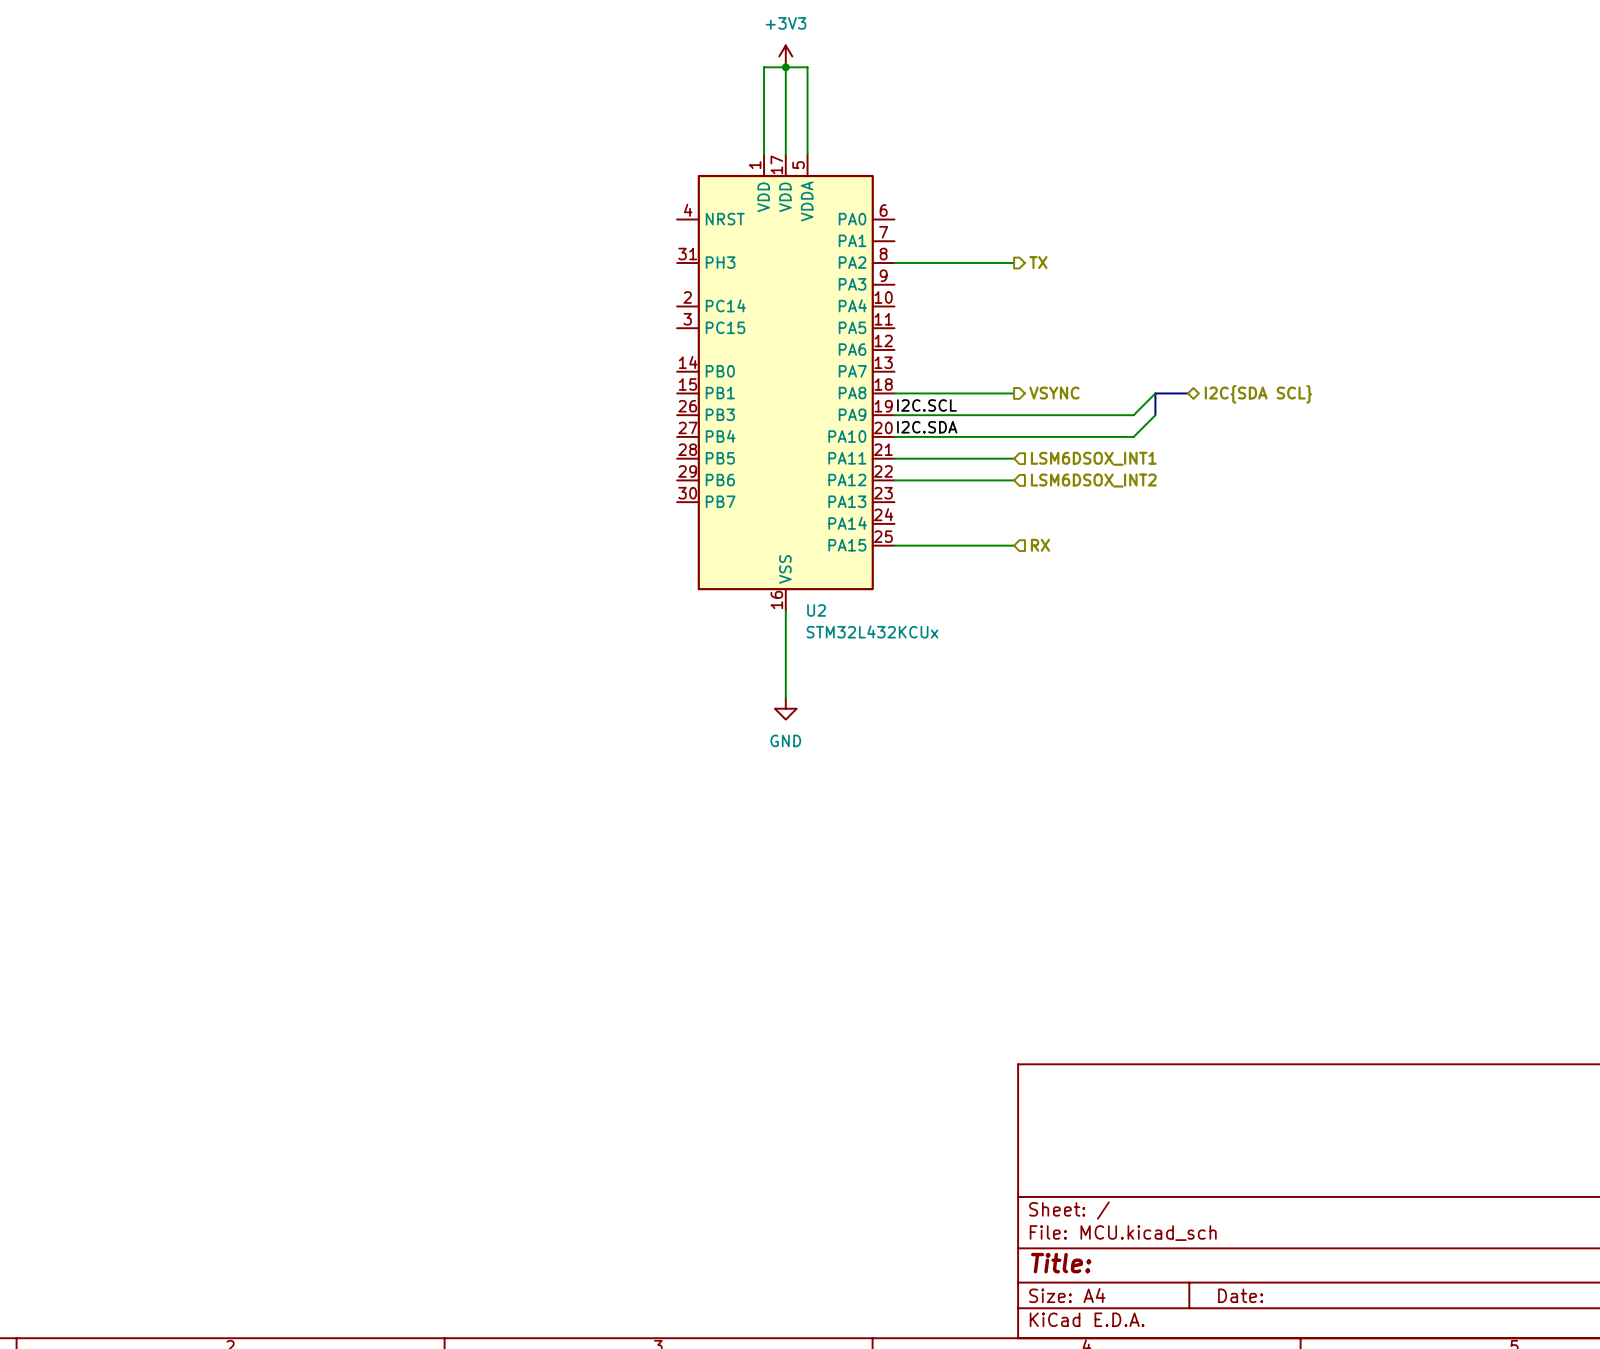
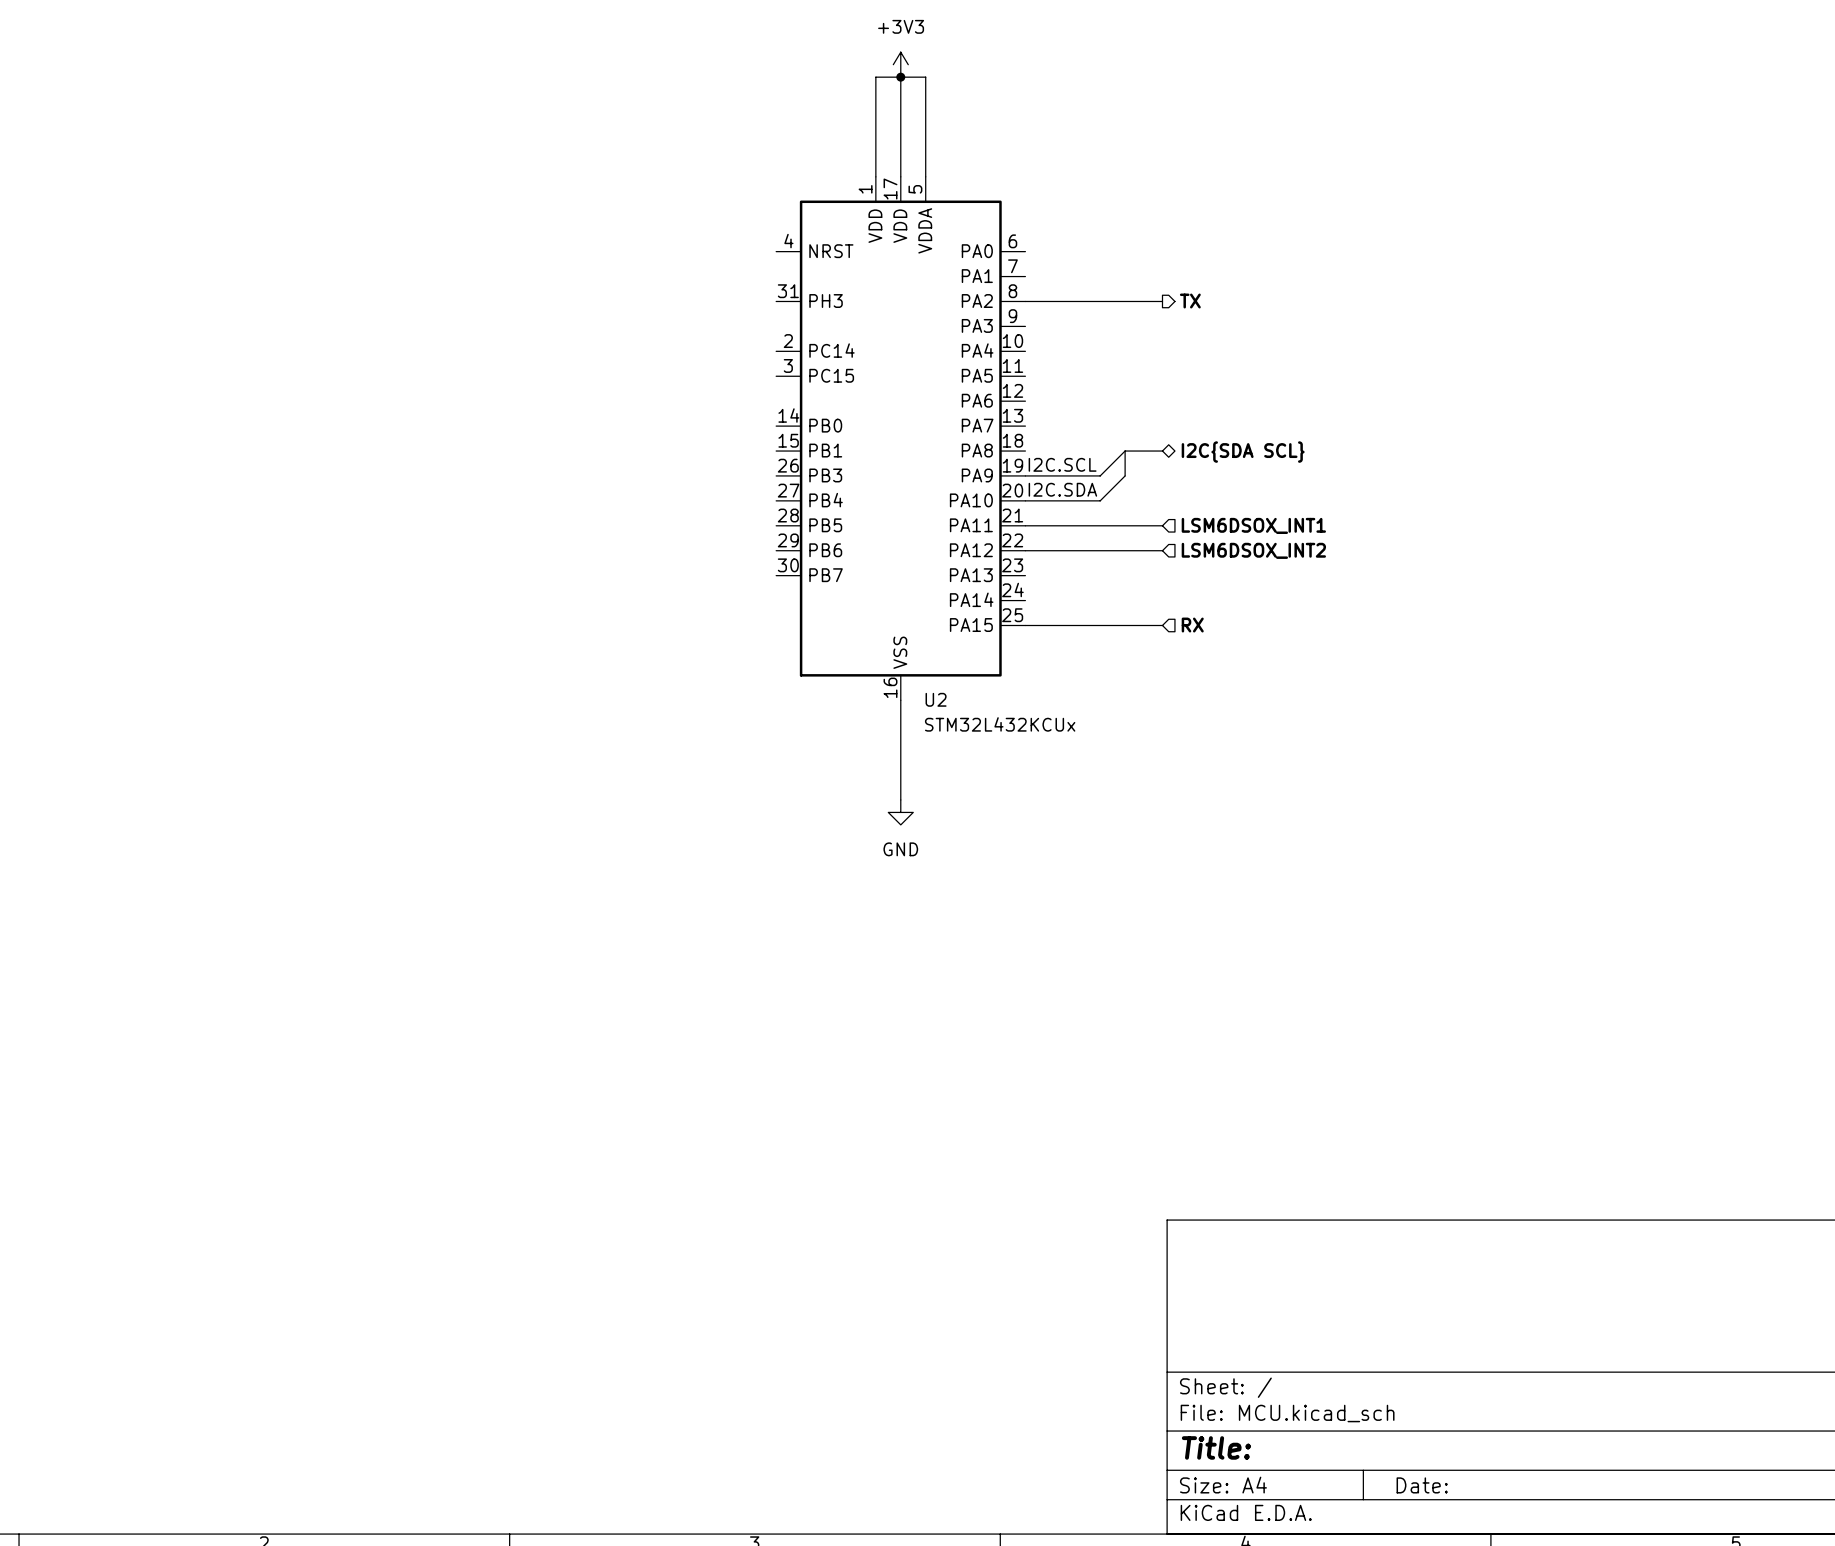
wire: (894, 393) (1014, 393) -> none
hierarchical label shape: output (1054, 393) -> bidirectional (1243, 452)
hierarchical label: VSYNC (1054, 393) -> I2C{SDA SCL} (1243, 452)
wire: (1155, 393) (1133, 415) (959, 415) -> (1125, 451) (1100, 475)
bus: (1188, 393) (1155, 393) (1155, 415) -> (1162, 451) (1125, 451) (1125, 475)
hierarchical label: I2C{SDA SCL} (1258, 394) -> none
wire: (1155, 415) (1133, 436) (959, 436) -> (1125, 475) (1100, 500)

